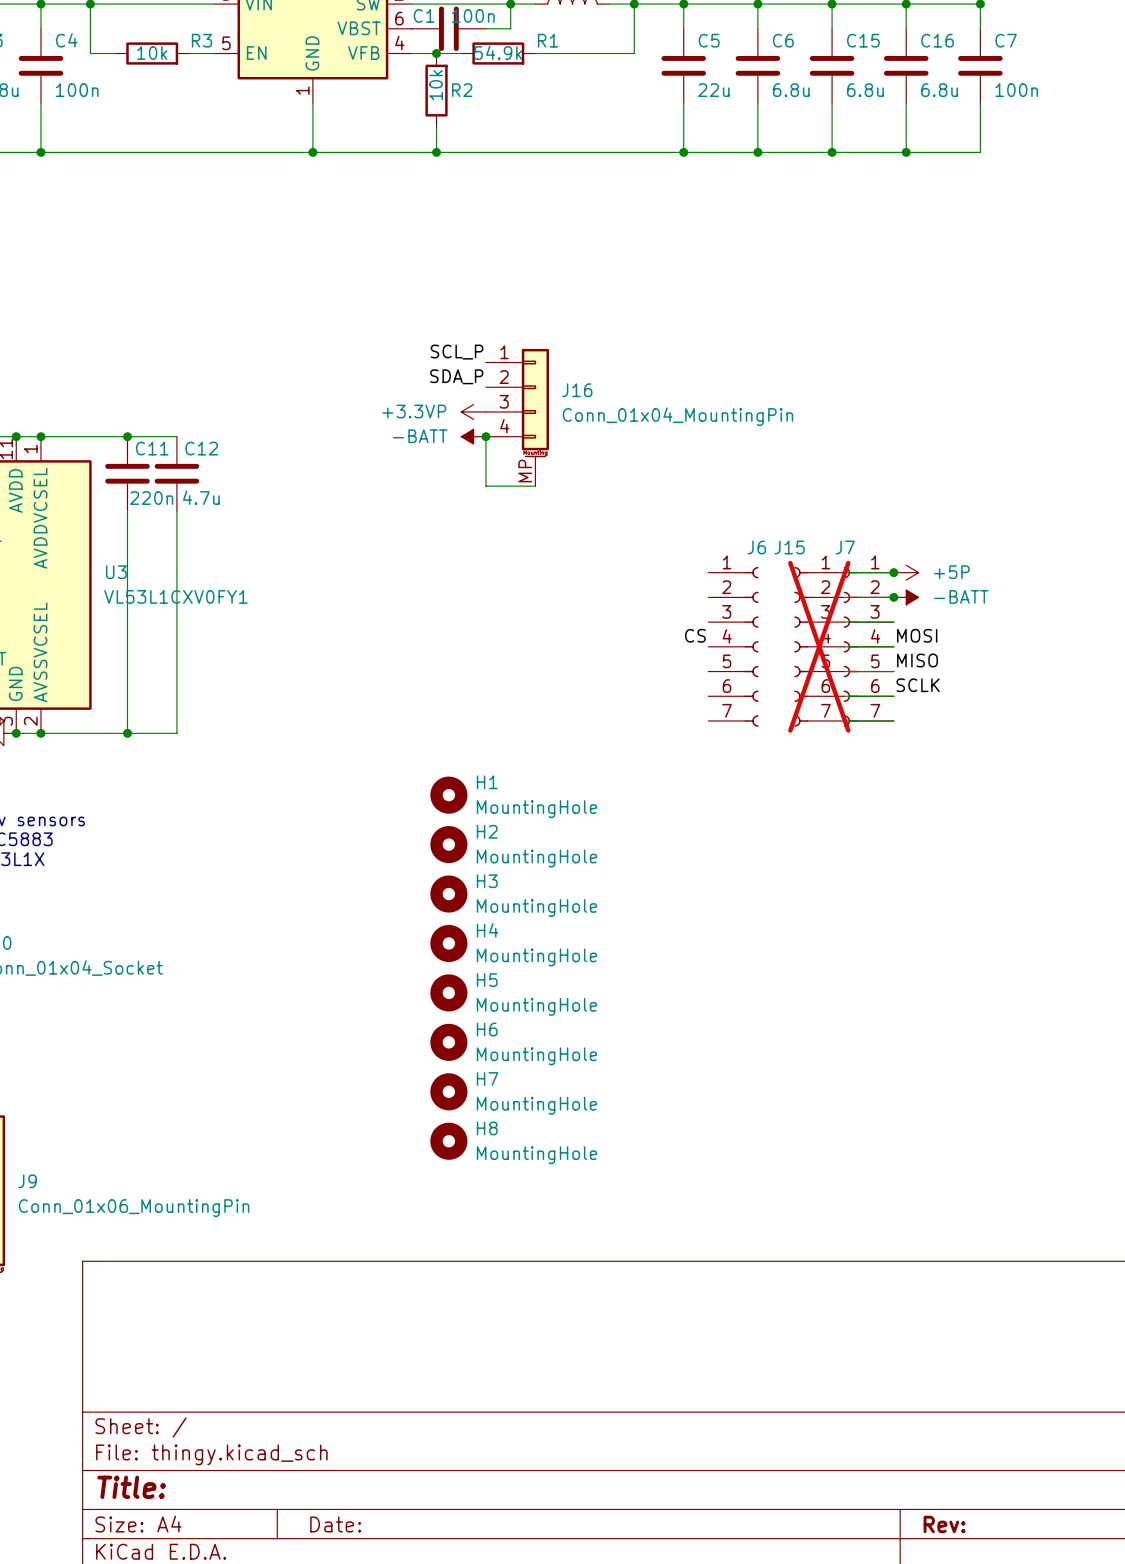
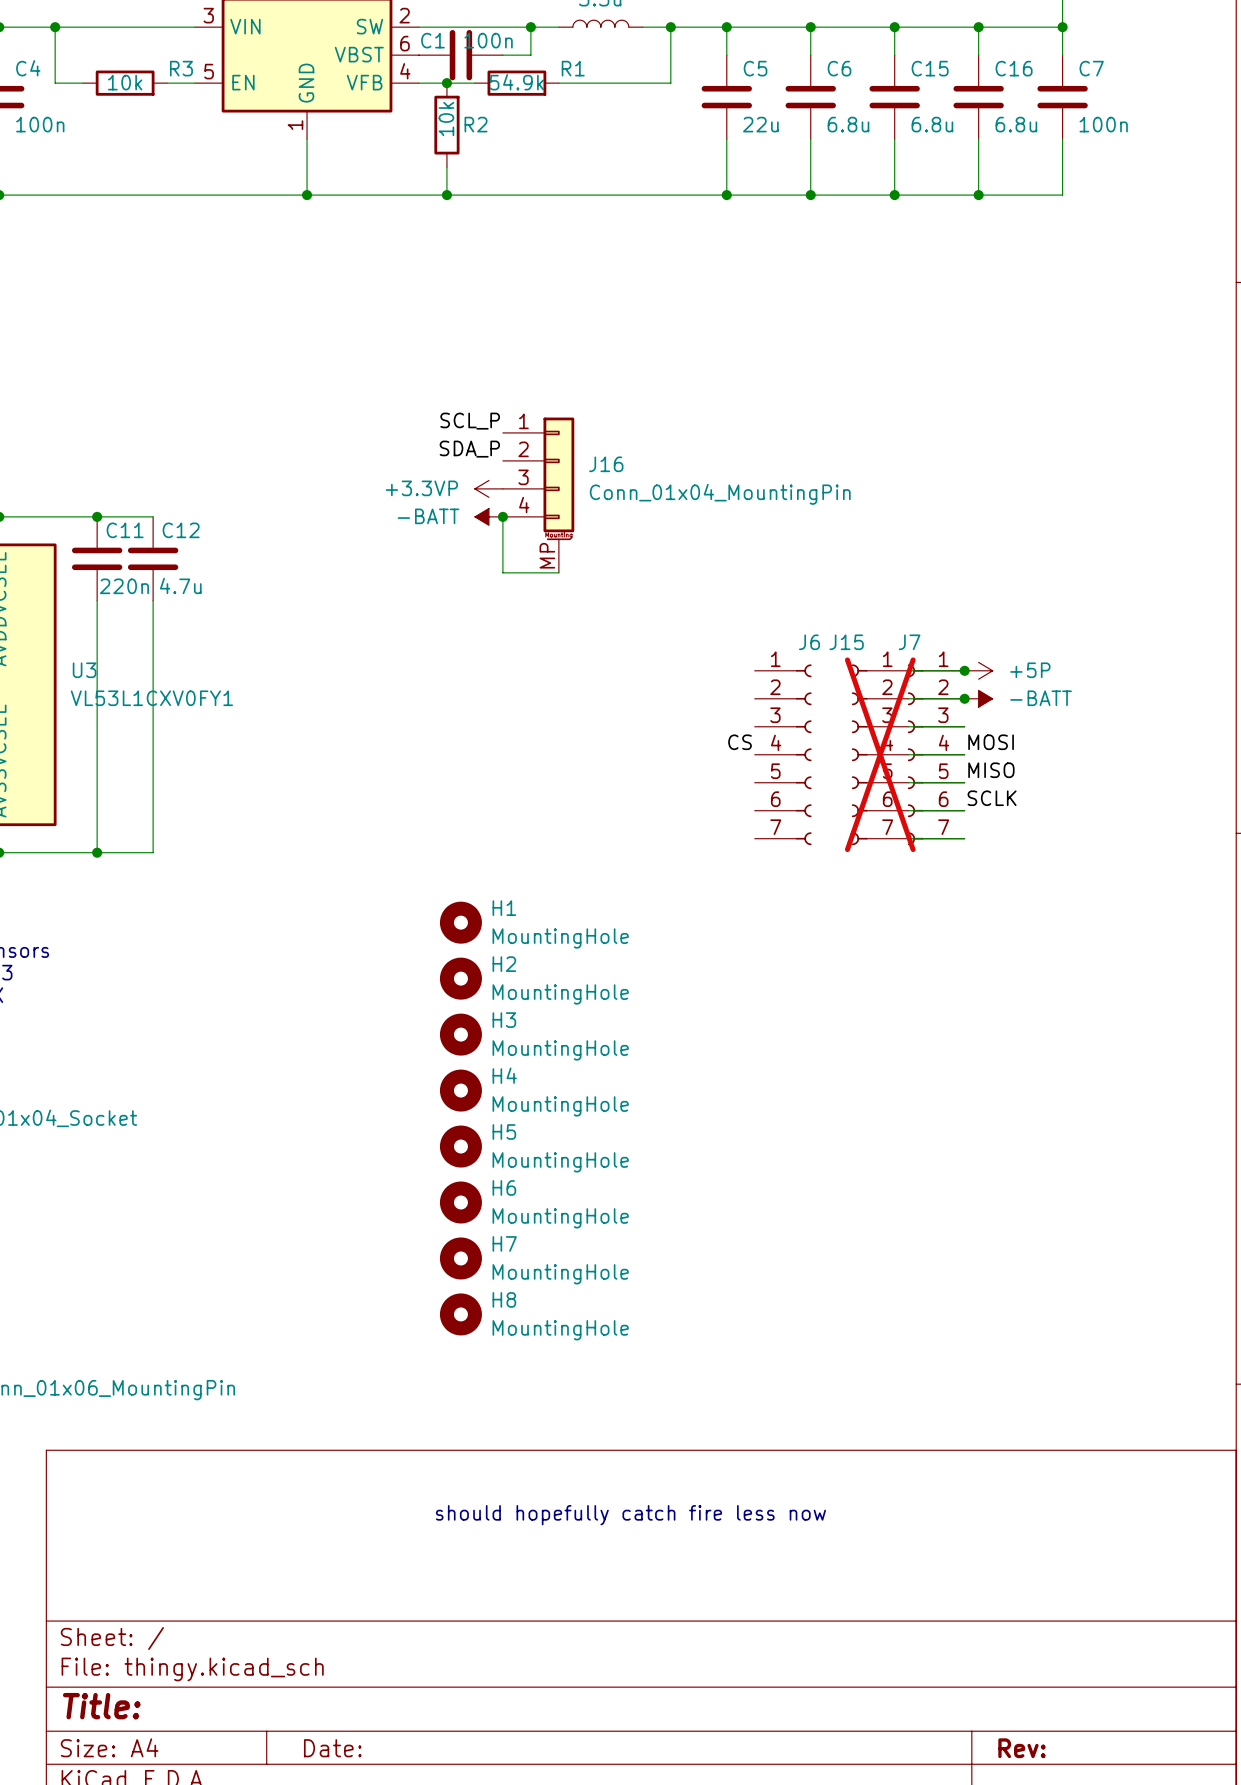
text: none -> should hopefully catch fire less now (630, 1515)

